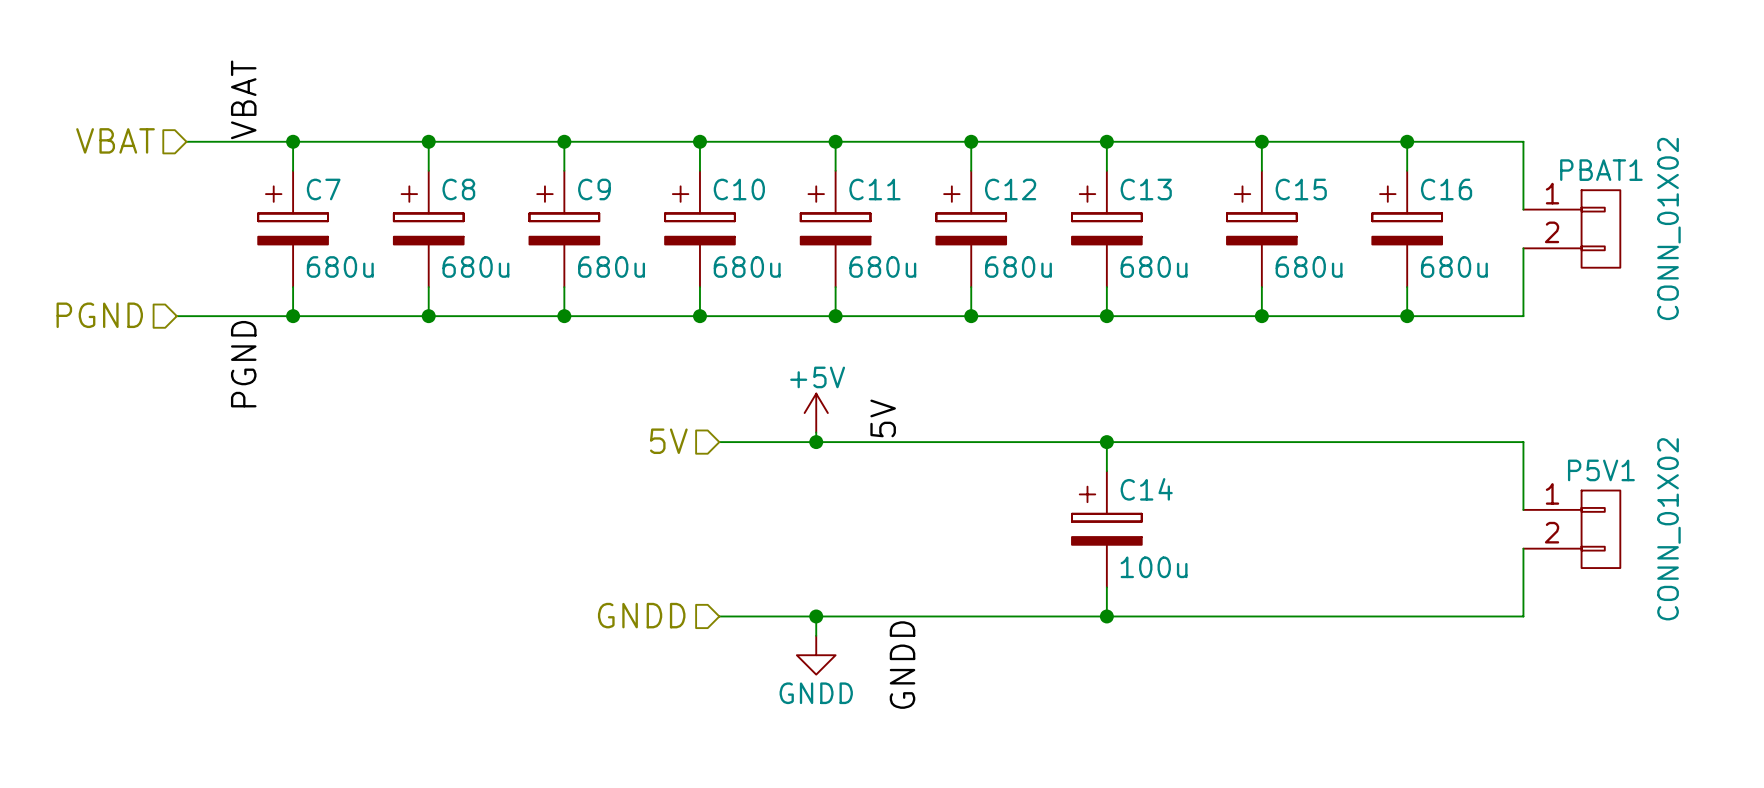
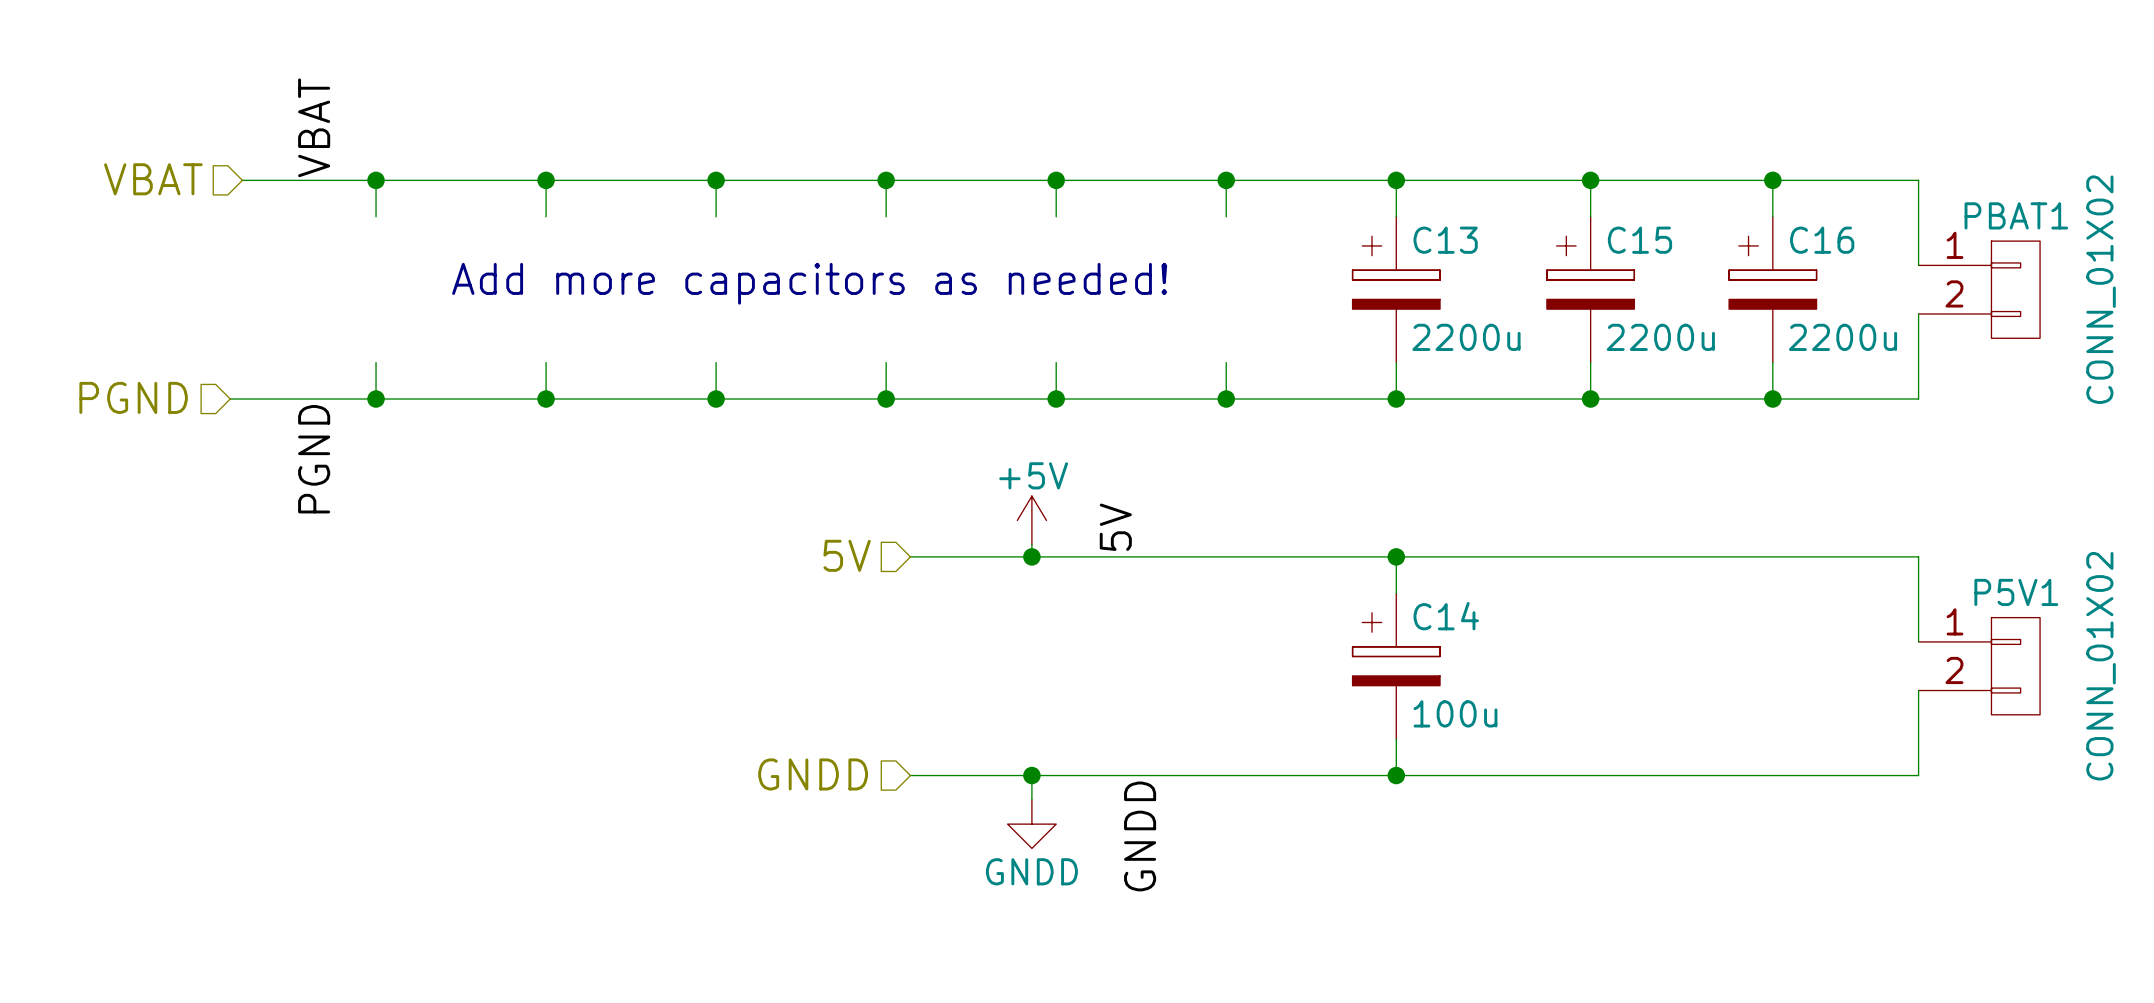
text: none -> Add more capacitors as needed! (809, 283)
C7: 680u (293, 228) -> none
C8: 680u (428, 228) -> none
C9: 680u (564, 228) -> none
C10: 680u (699, 228) -> none
C11: 680u (835, 228) -> none
C12: 680u (971, 228) -> none
C13 value: 680u (1154, 266) -> 2200u (1466, 337)
C15 value: 680u (1309, 266) -> 2200u (1660, 337)
C16 value: 680u (1454, 266) -> 2200u (1842, 337)

